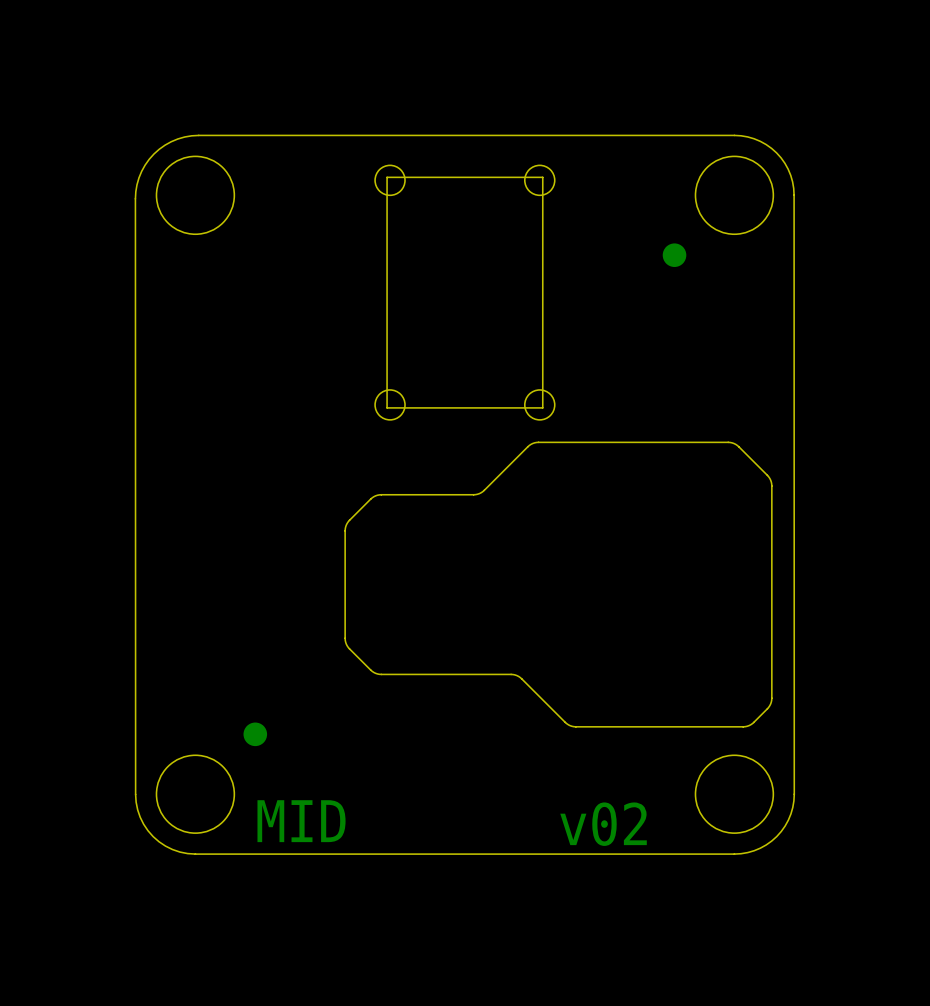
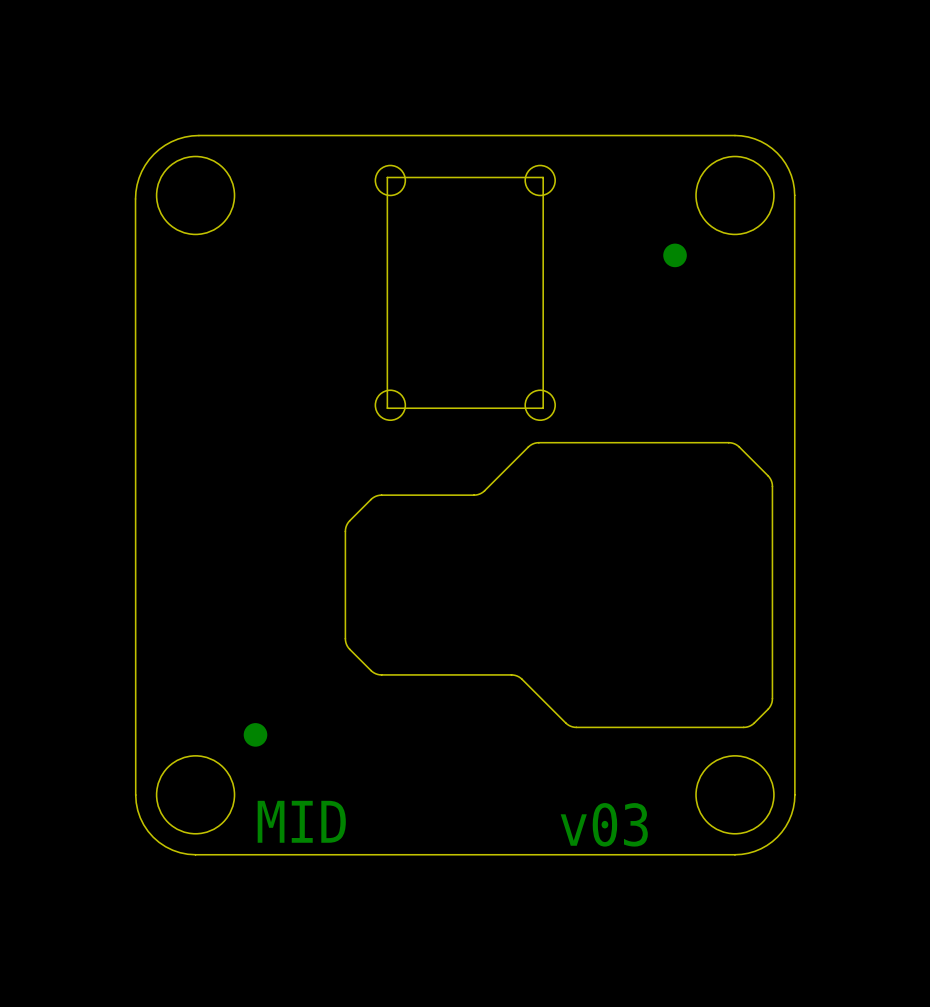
text: v02 (603, 824) -> v03 (604, 824)

